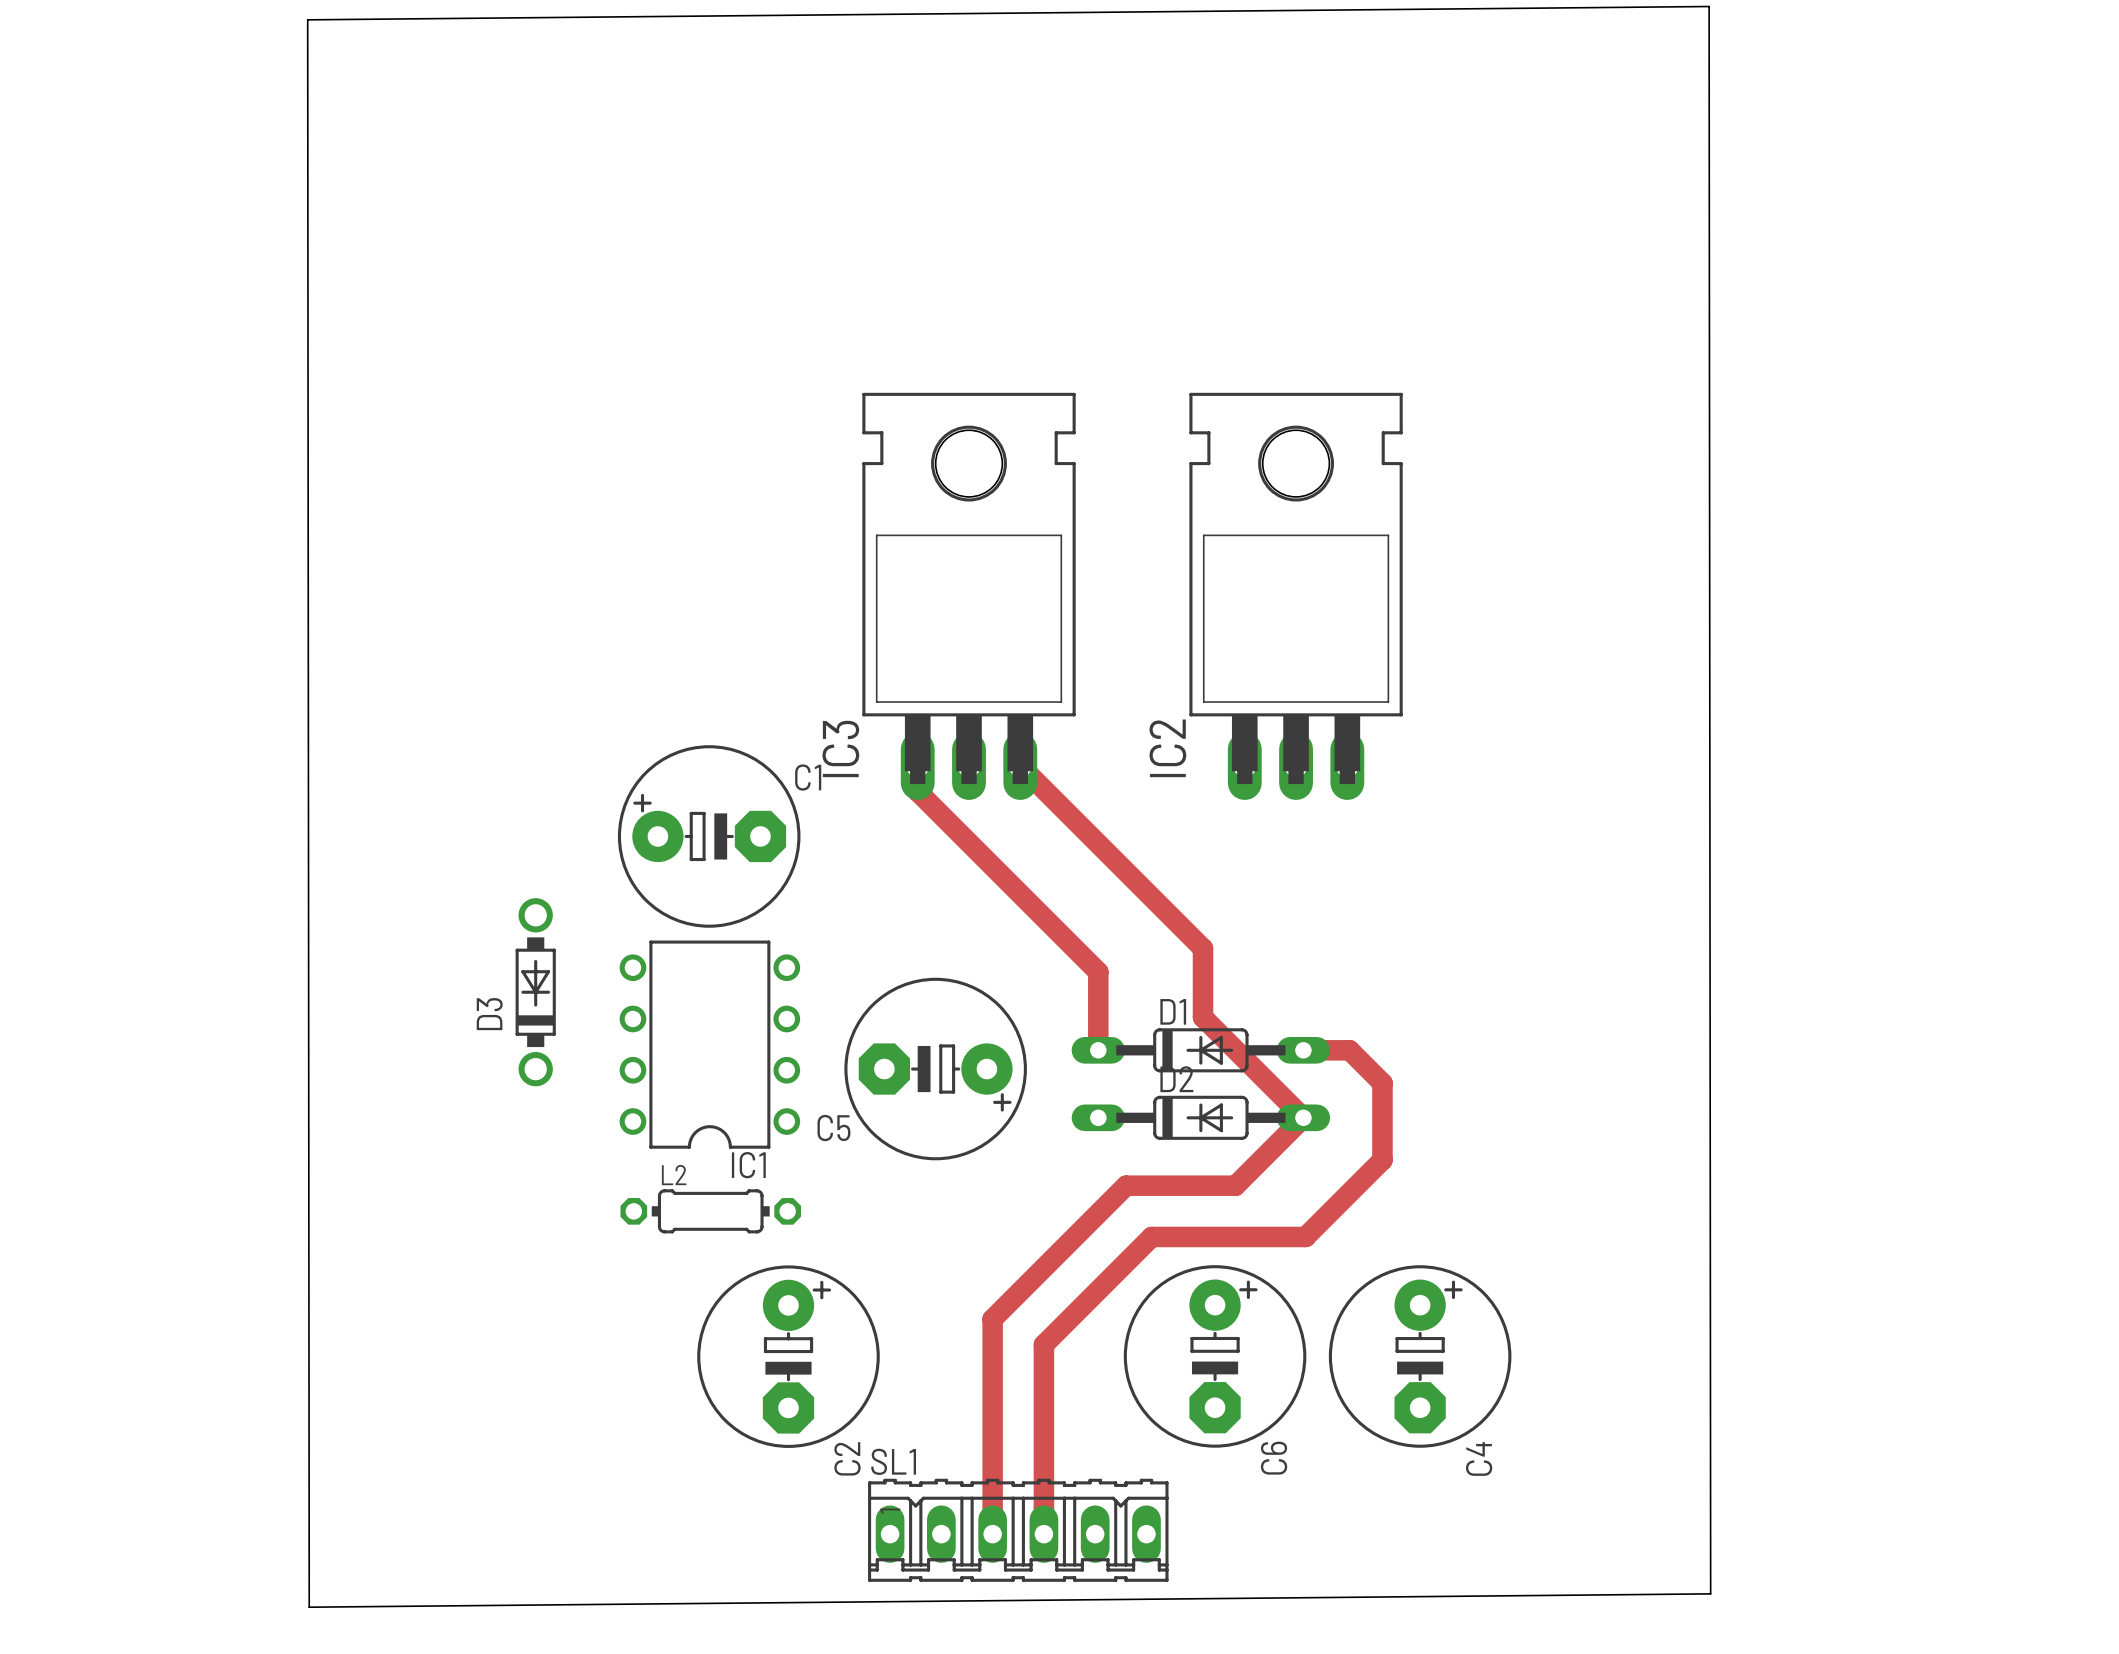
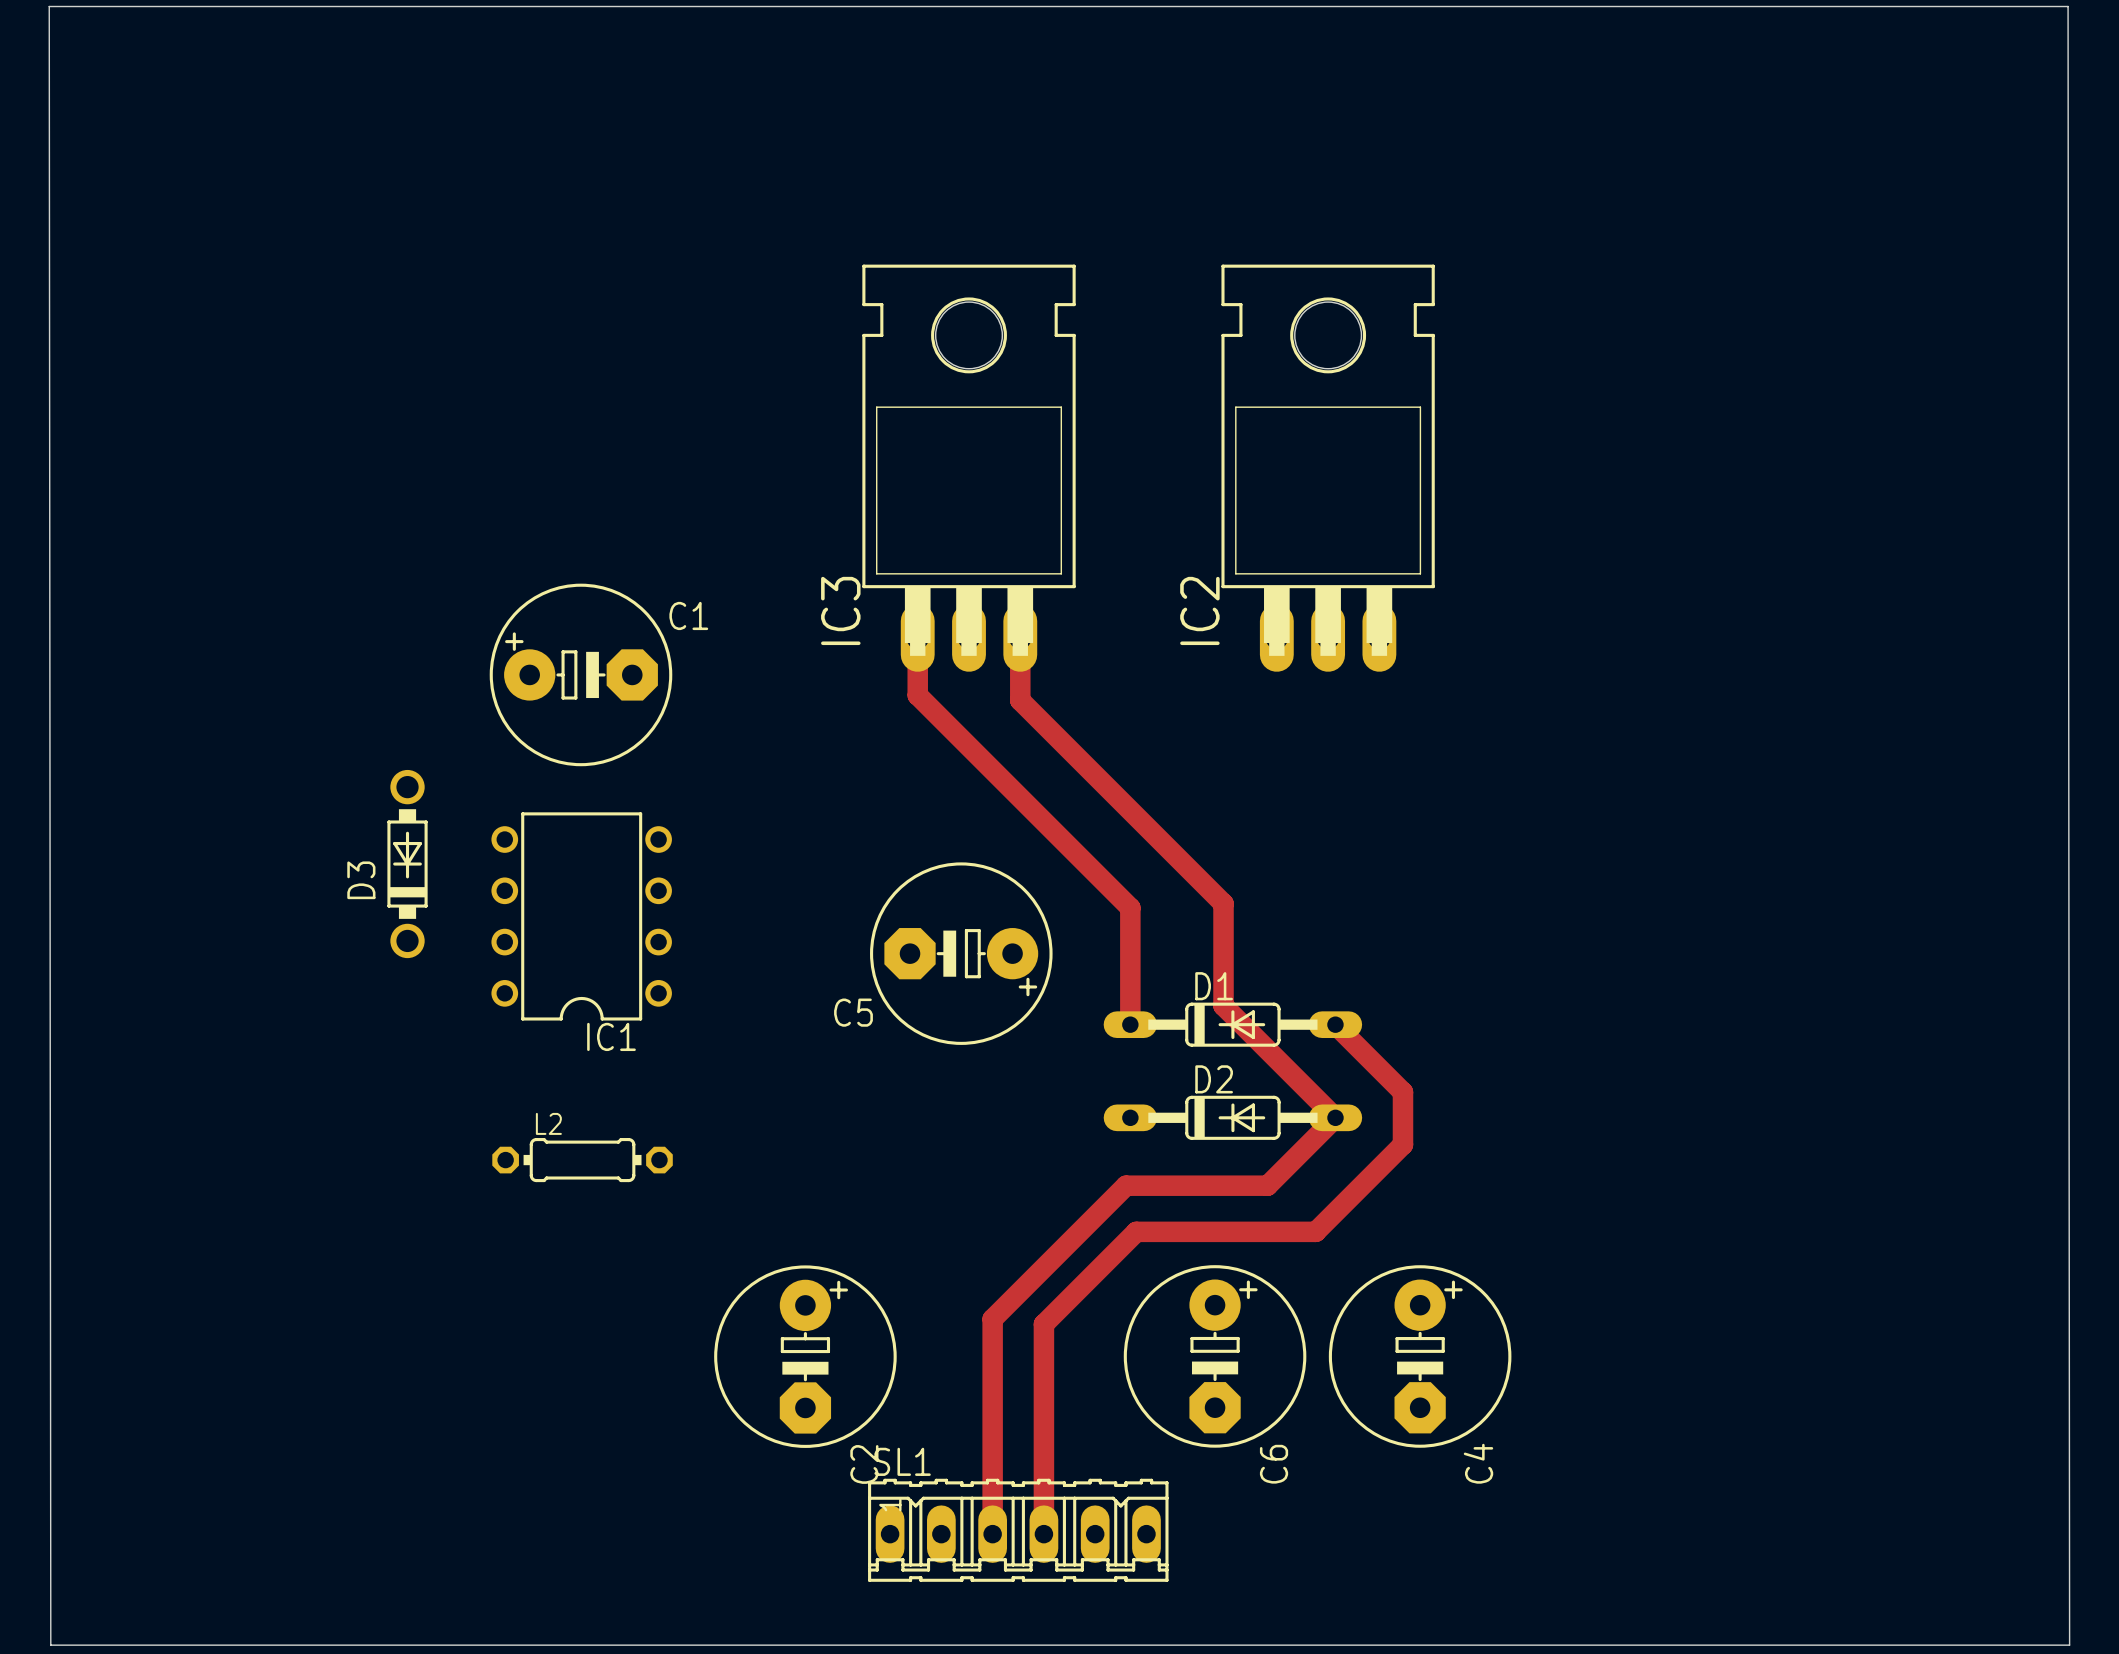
board edge: (1709, 6) (1710, 1593) (309, 1607) (307, 19) (1709, 6) -> (49, 6) (50, 1645) (2069, 1645) (2068, 6) (49, 6)
IC3 position: (969, 596) -> (969, 468)
IC2 position: (1296, 596) -> (1328, 468)
track: none -> (917, 637) (917, 695) (1130, 907) (1130, 1024)
track: (917, 766) (917, 791) (1098, 972) (1098, 1050) -> none
track: (1020, 766) (1203, 948) (1203, 1017) (1303, 1117) (1235, 1185) -> (1020, 637) (1020, 700) (1223, 903) (1223, 1005) (1335, 1117) (1267, 1185) (1235, 1185)
C1 position: (709, 836) -> (581, 674)
D3 position: (535, 992) -> (407, 864)
D1 footprint: [1071, 1028, 1331, 1073] -> [1103, 1002, 1363, 1047]
IC1 position: (709, 1044) -> (581, 916)
track: (1303, 1050) (1349, 1050) (1382, 1083) (1382, 1160) (1305, 1236) (1151, 1236) (1043, 1344) -> (1335, 1024) (1402, 1092) (1402, 1144) (1315, 1231) (1136, 1231) (1043, 1324) (1043, 1344)
C5 position: (935, 1069) -> (961, 953)
D2 position: (1200, 1117) -> (1232, 1117)
L2 position: (710, 1211) -> (582, 1160)
C2 position: (788, 1356) -> (805, 1356)

